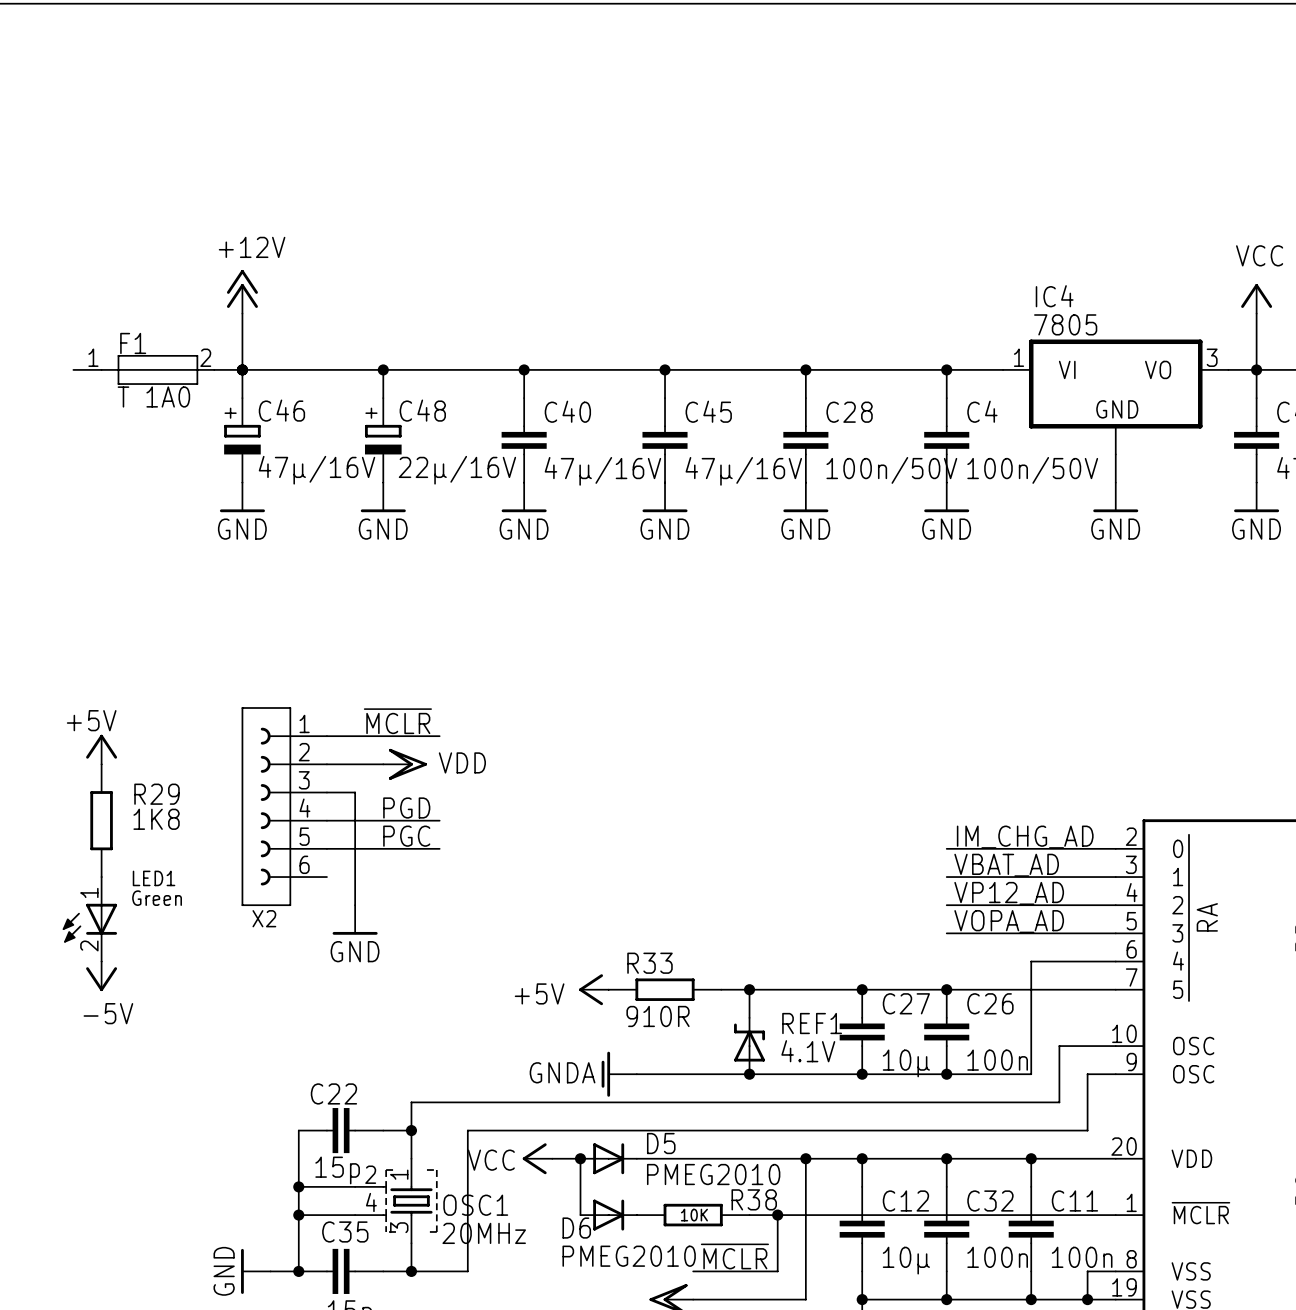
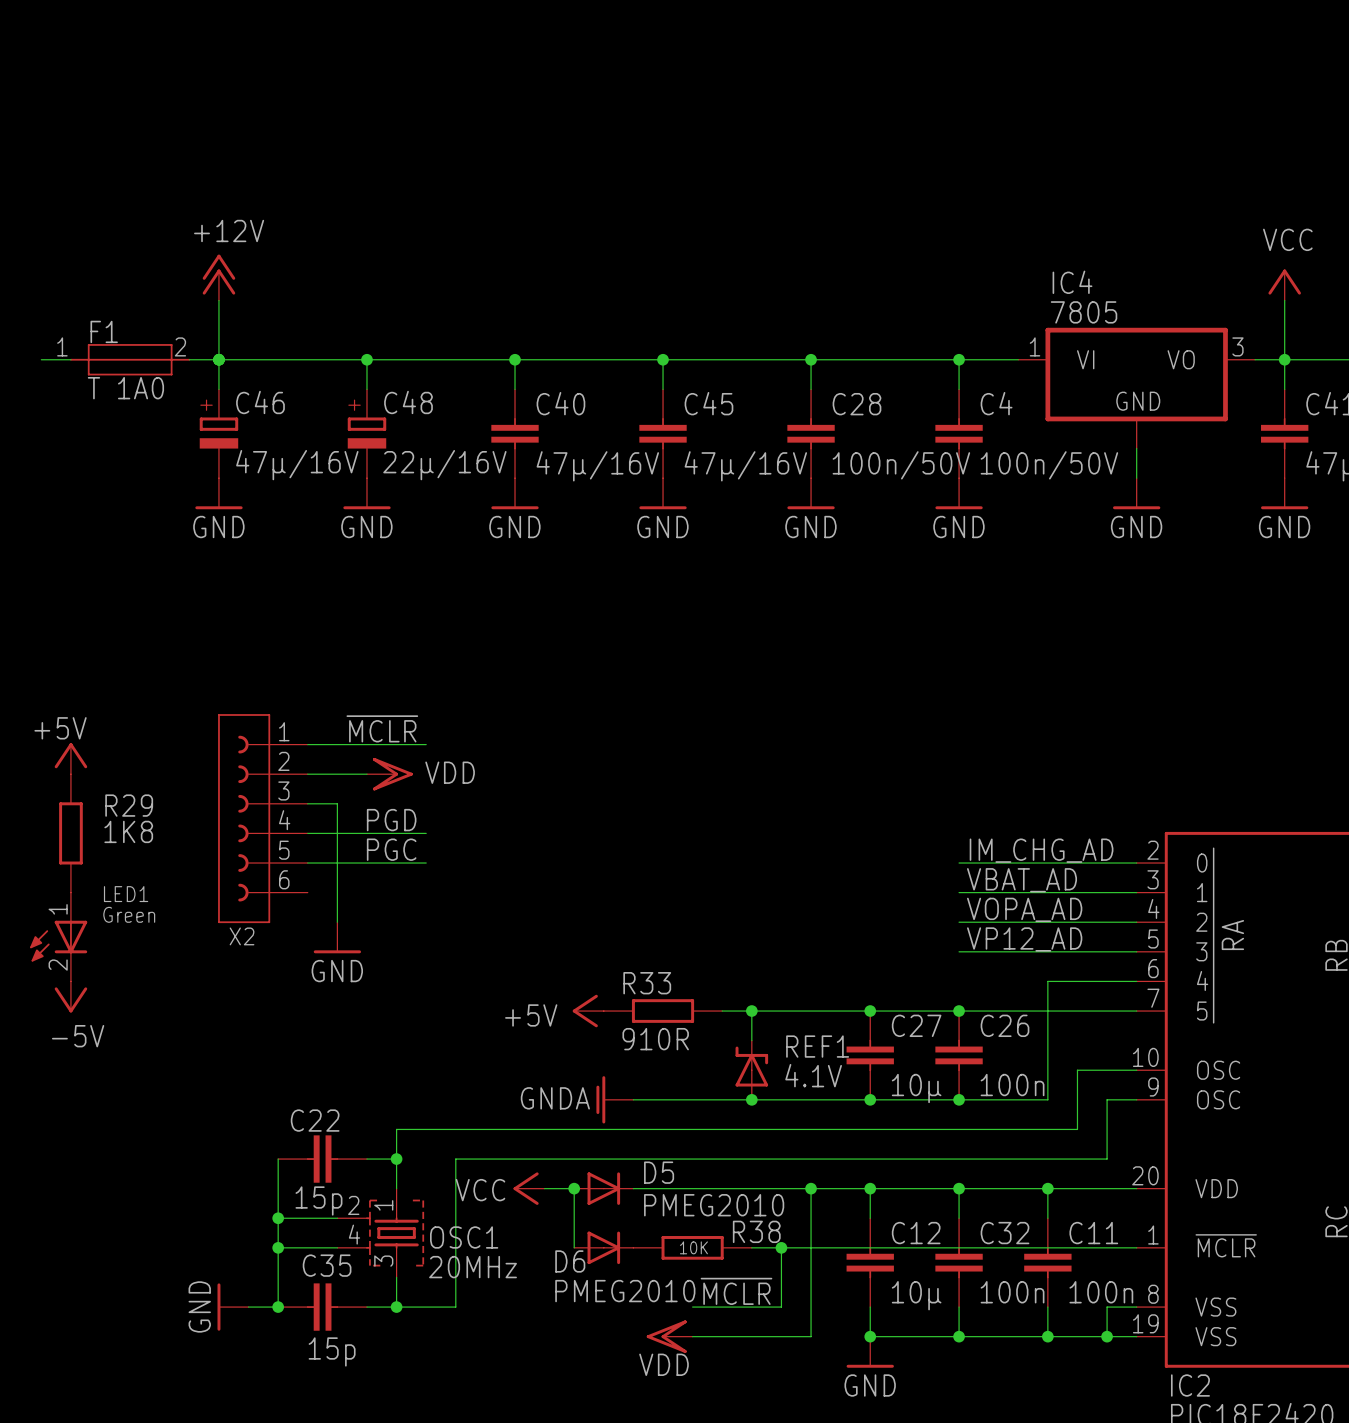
label: VP12_AD (1009, 893) -> VOPA_AD (1024, 909)
label: VOPA_AD (1009, 921) -> VP12_AD (1024, 939)

